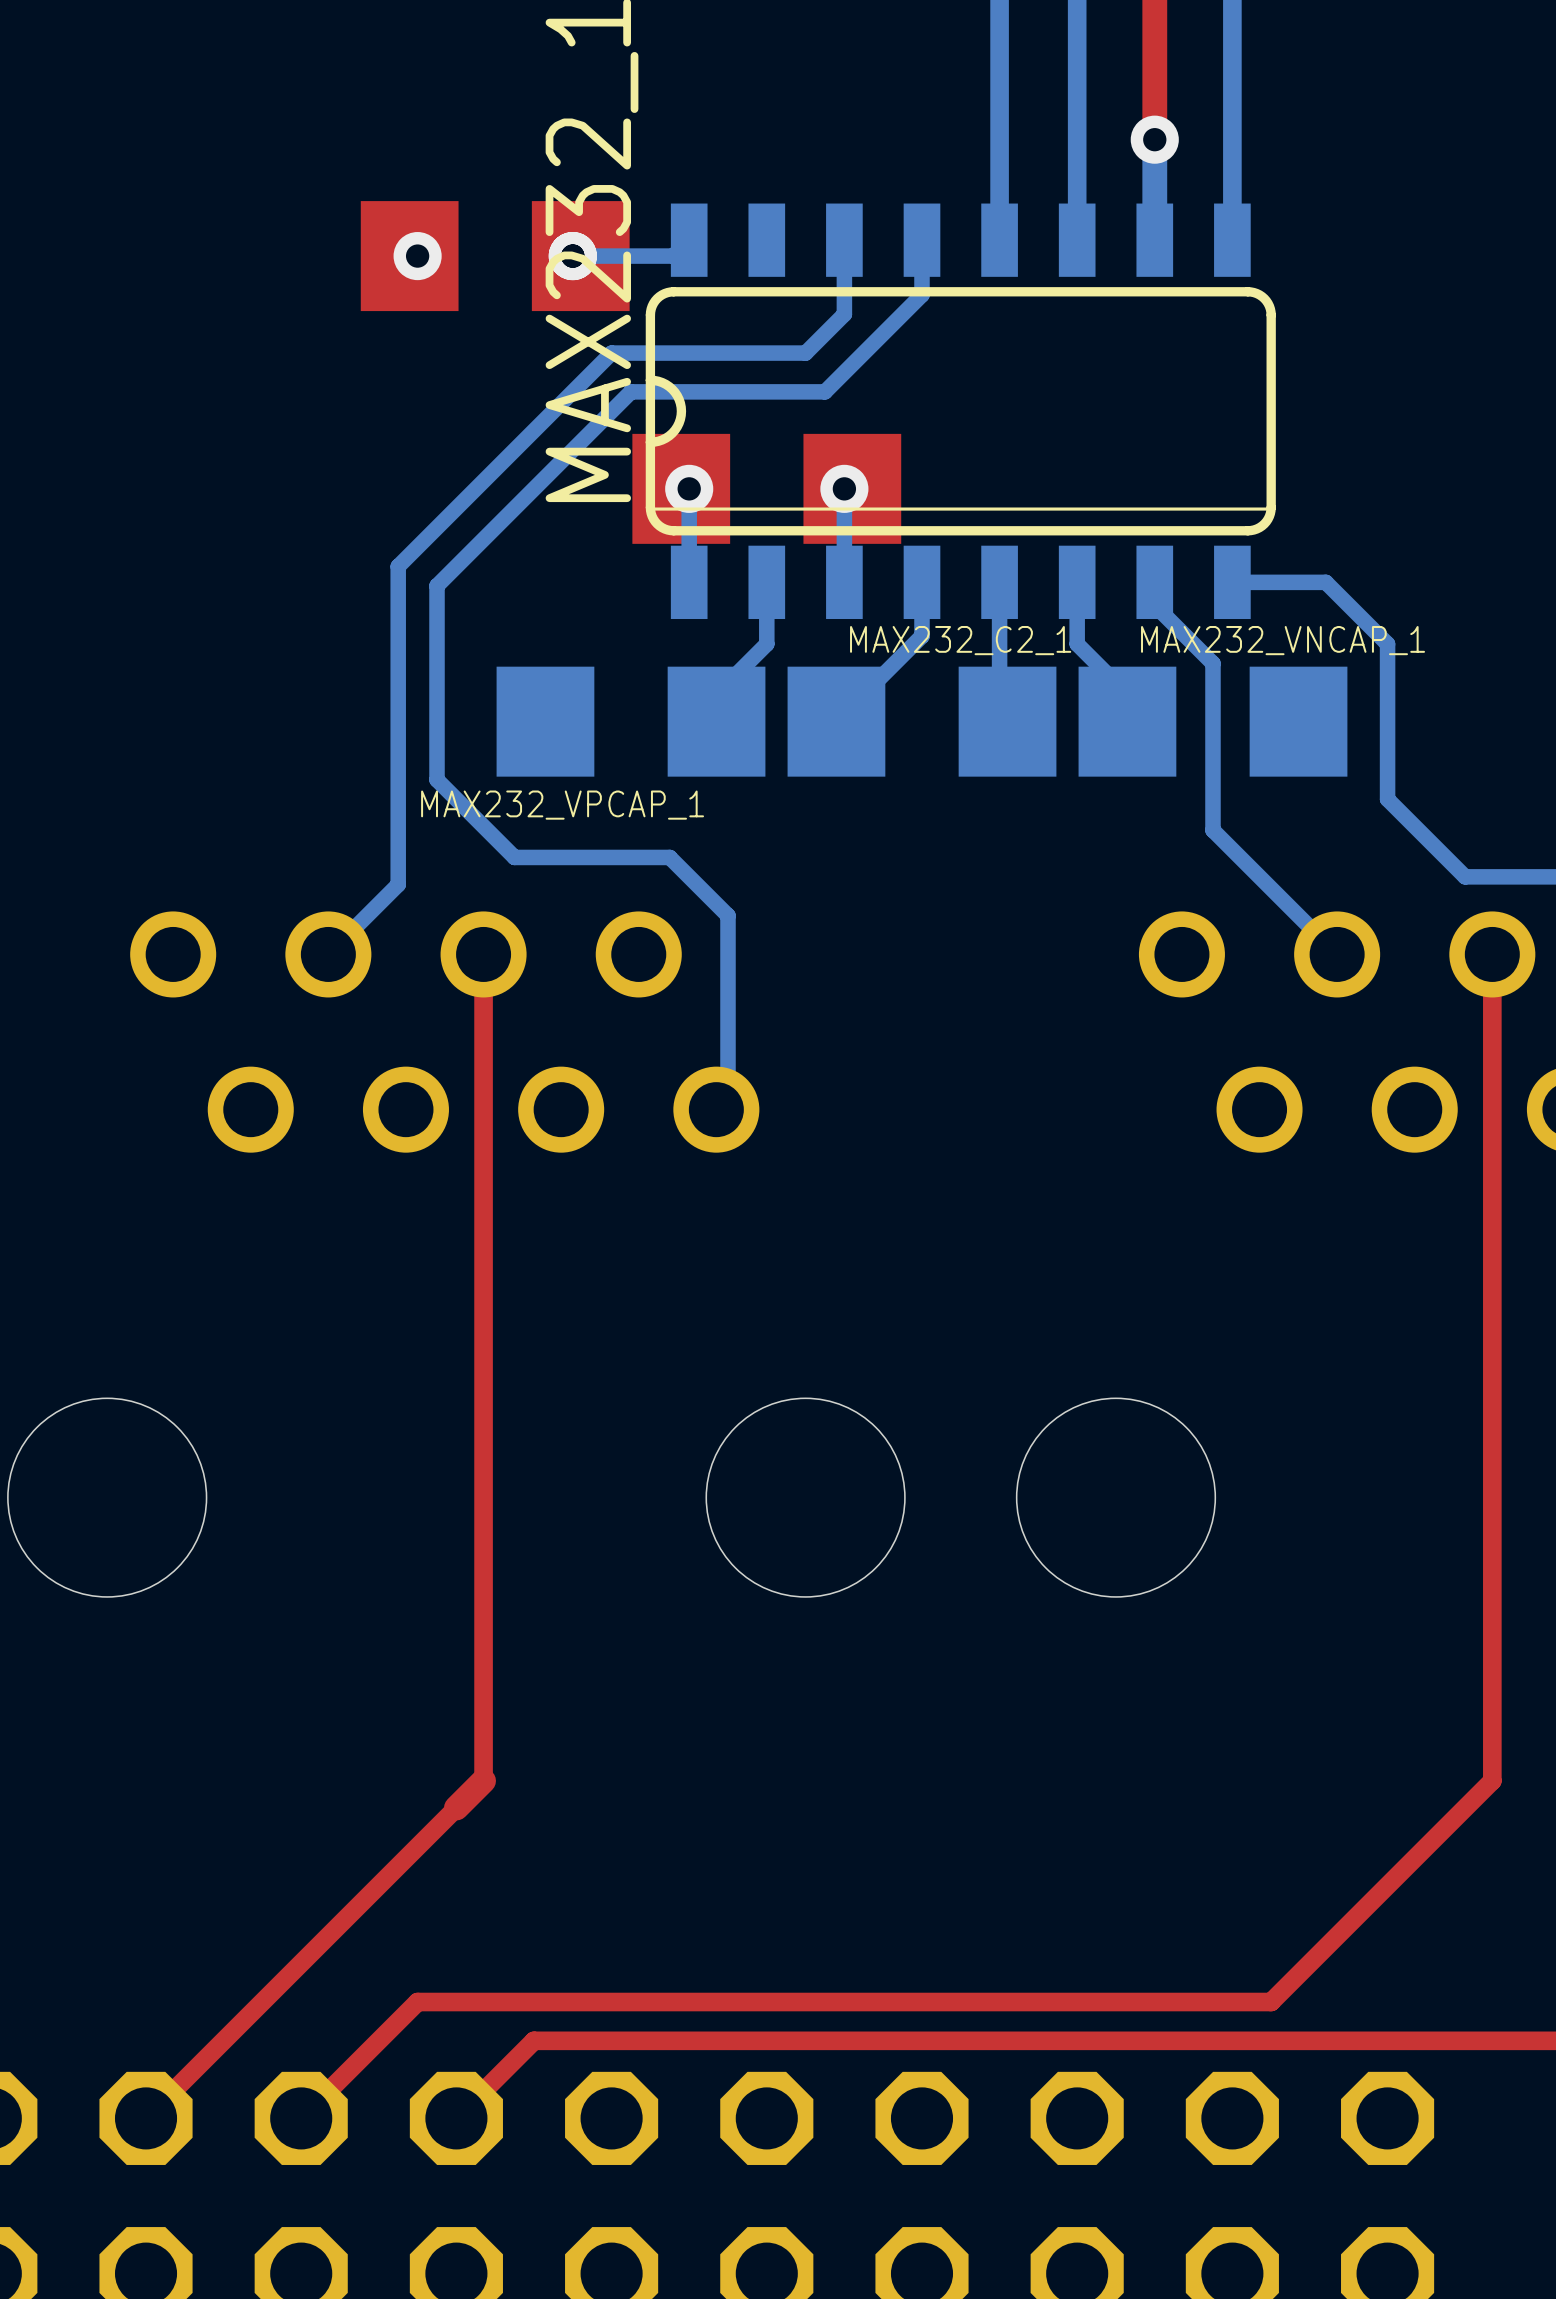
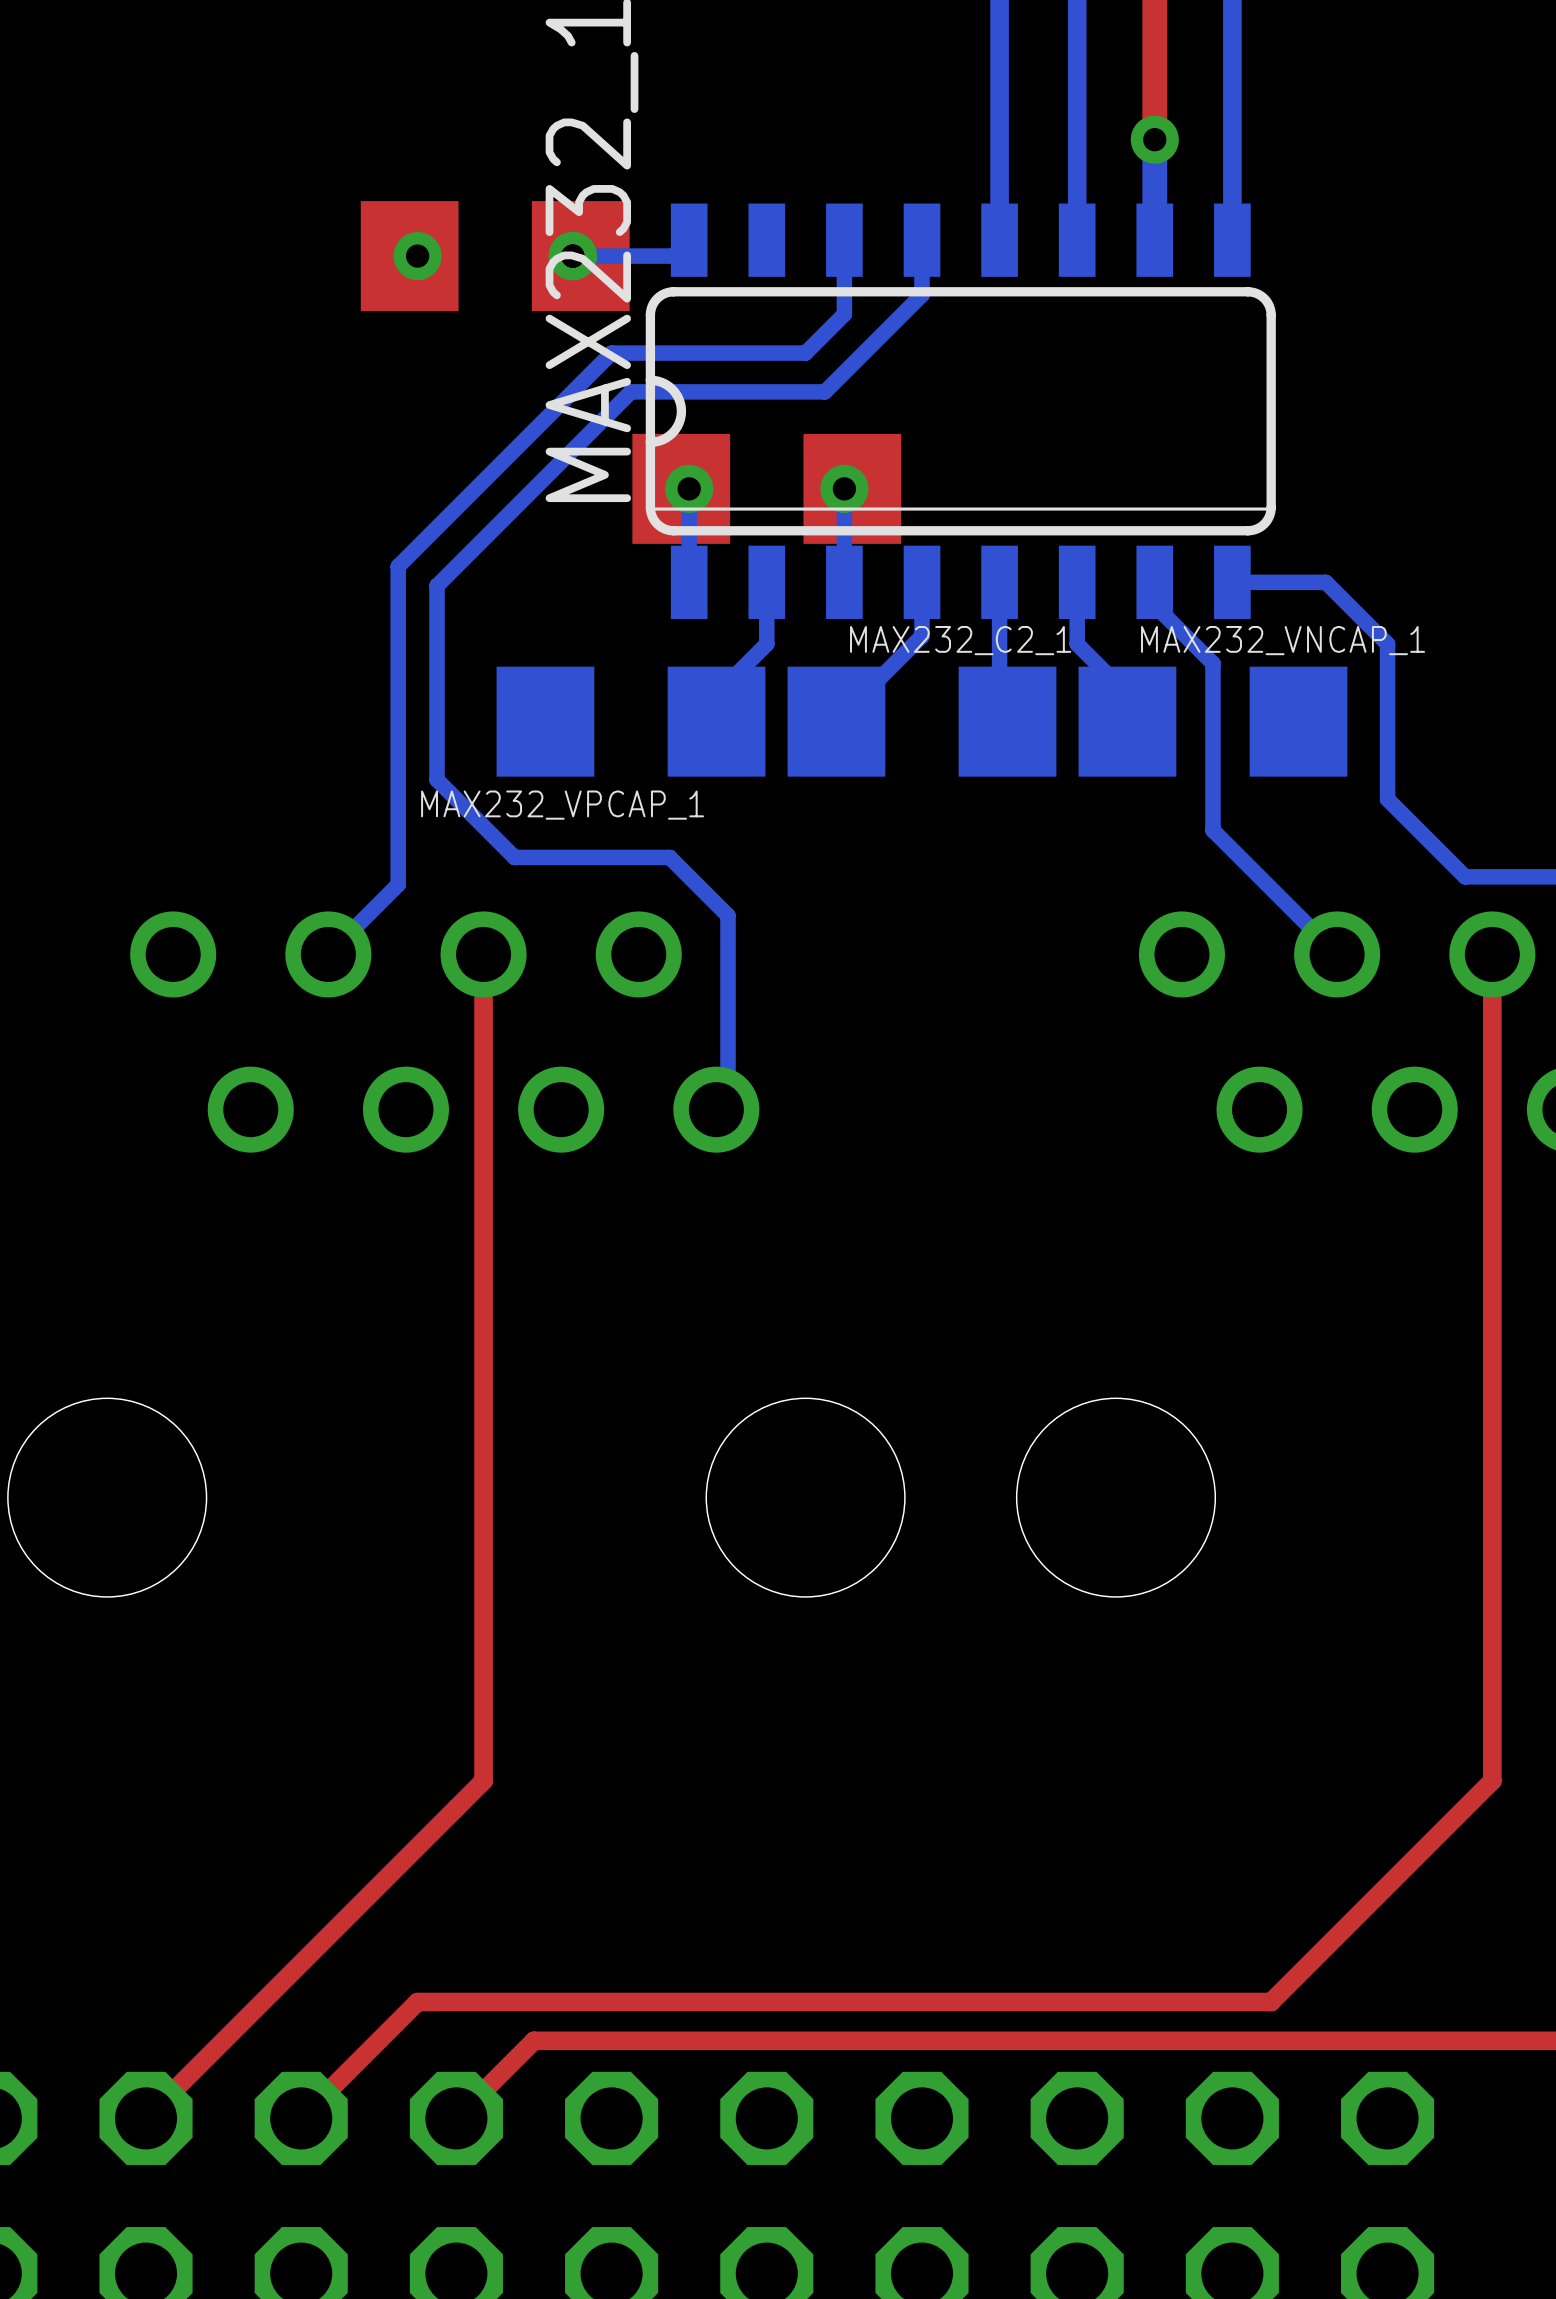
top track width: thick (483, 1780) (456, 1808) -> thin (483, 1780) (456, 1808)

